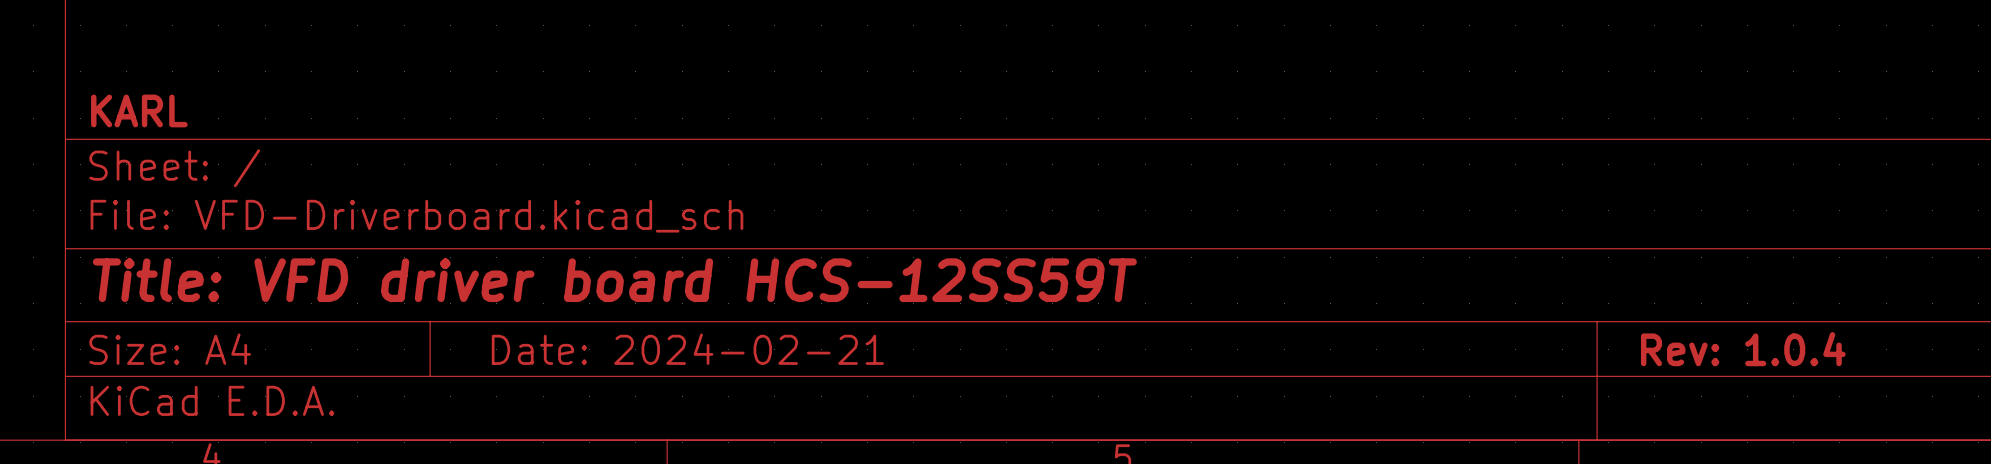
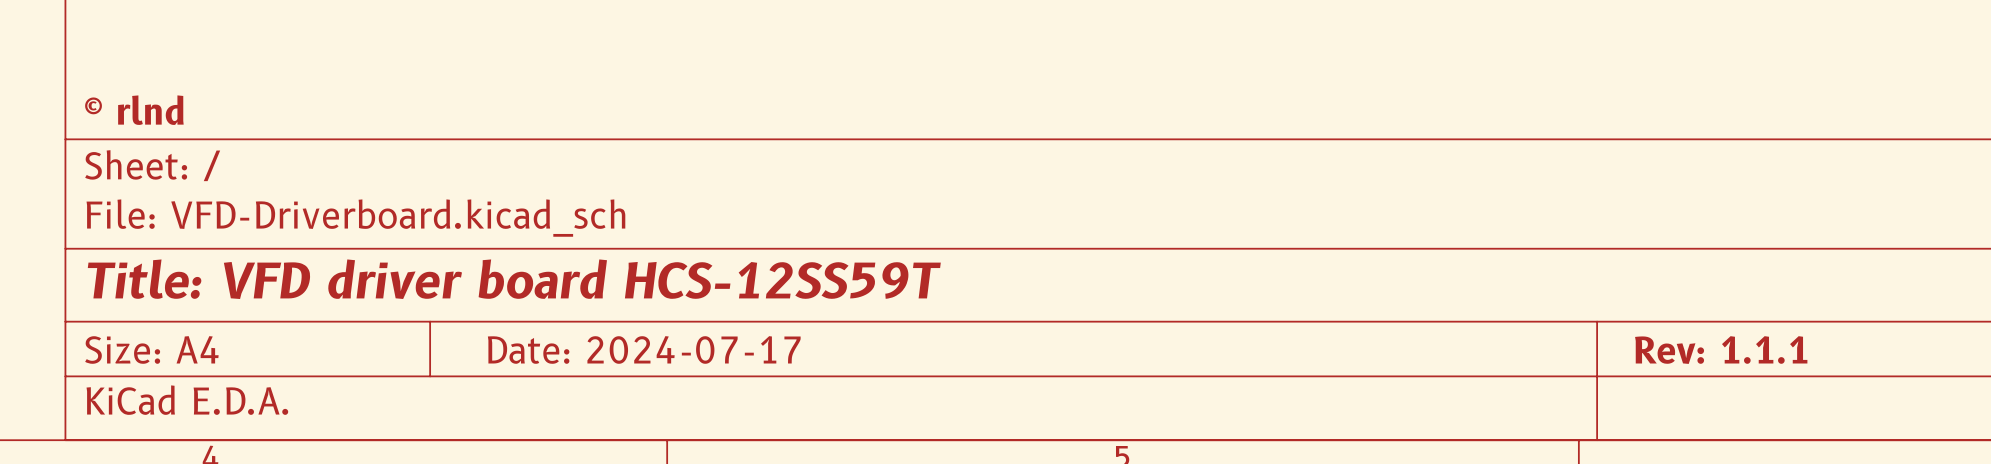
title block: KARL (139, 110) -> © rlnd (134, 110)
title block: Date: 2024-02-21 (687, 349) -> Date: 2024-07-17 (644, 349)
title block: Rev: 1.0.4 (1743, 349) -> Rev: 1.1.1 (1721, 350)

